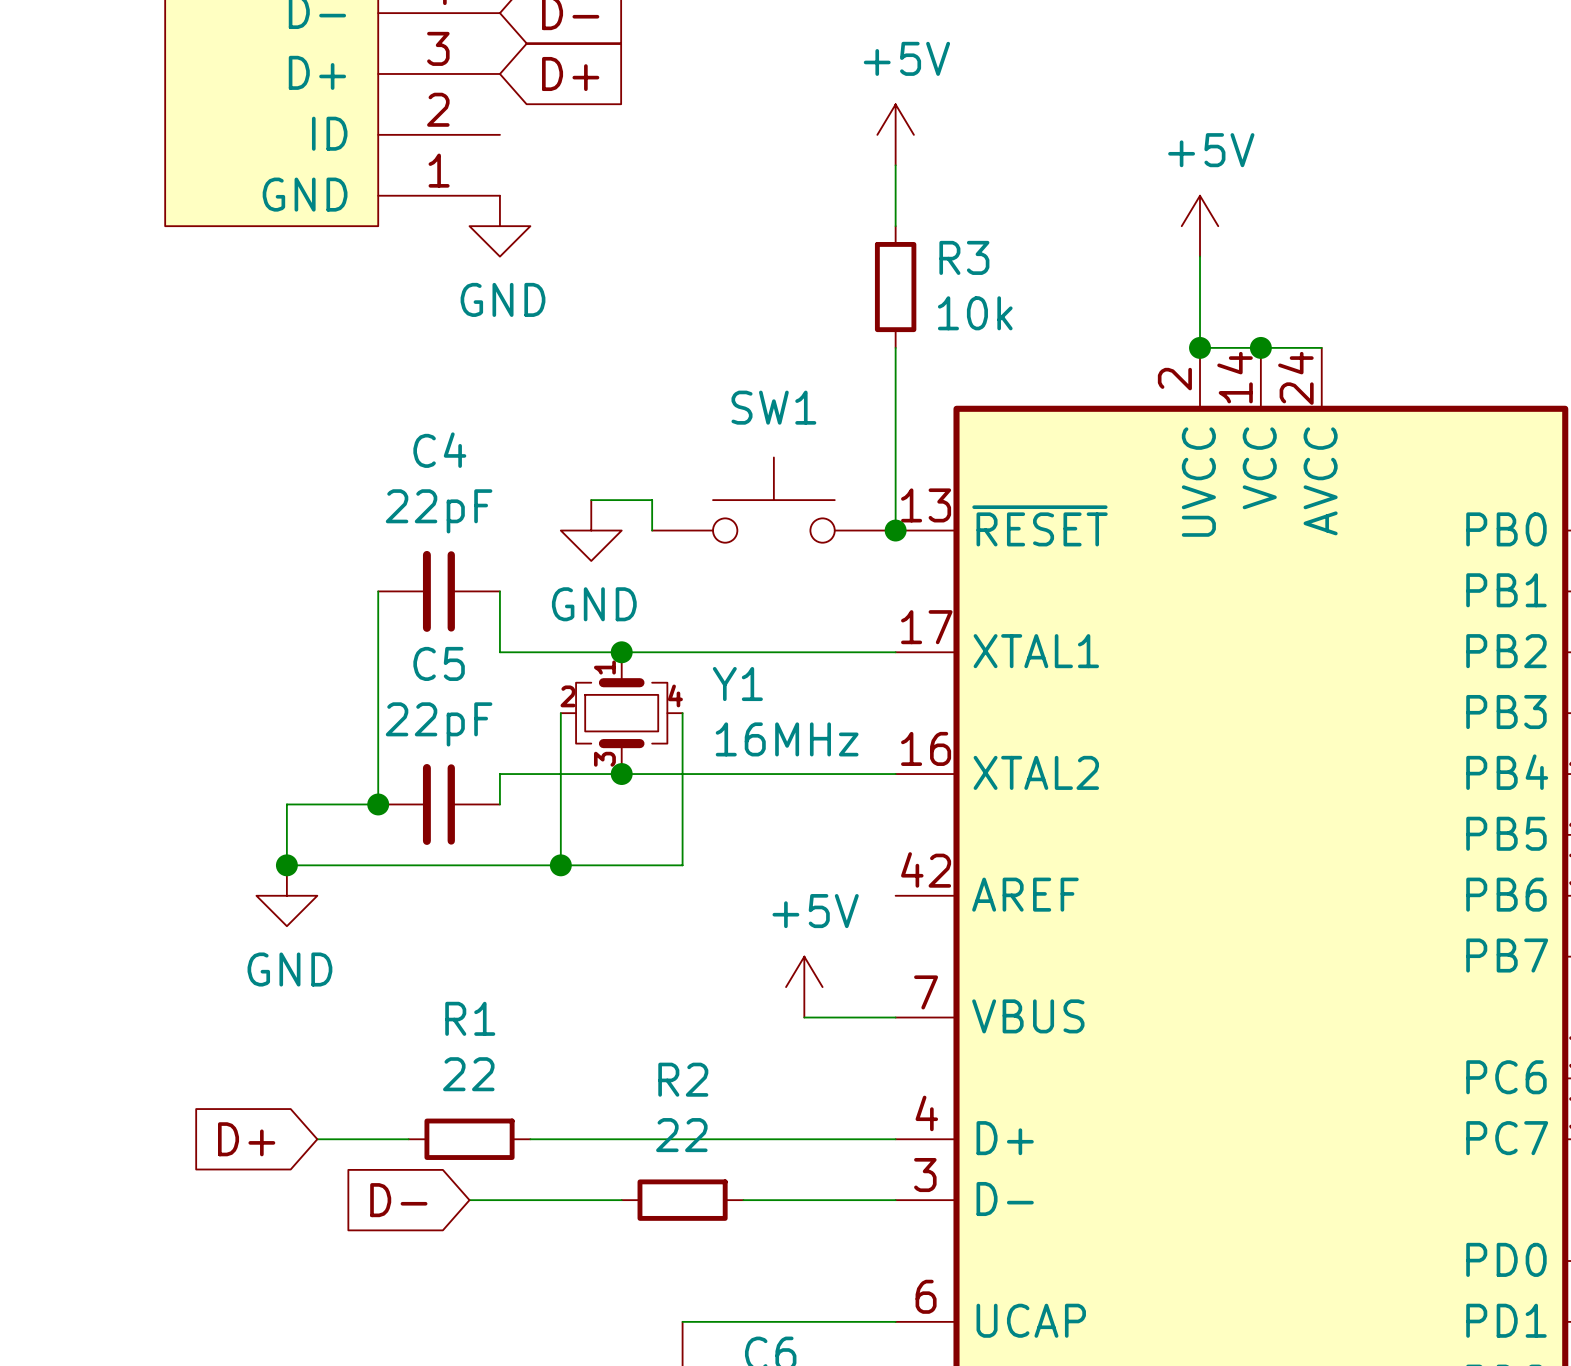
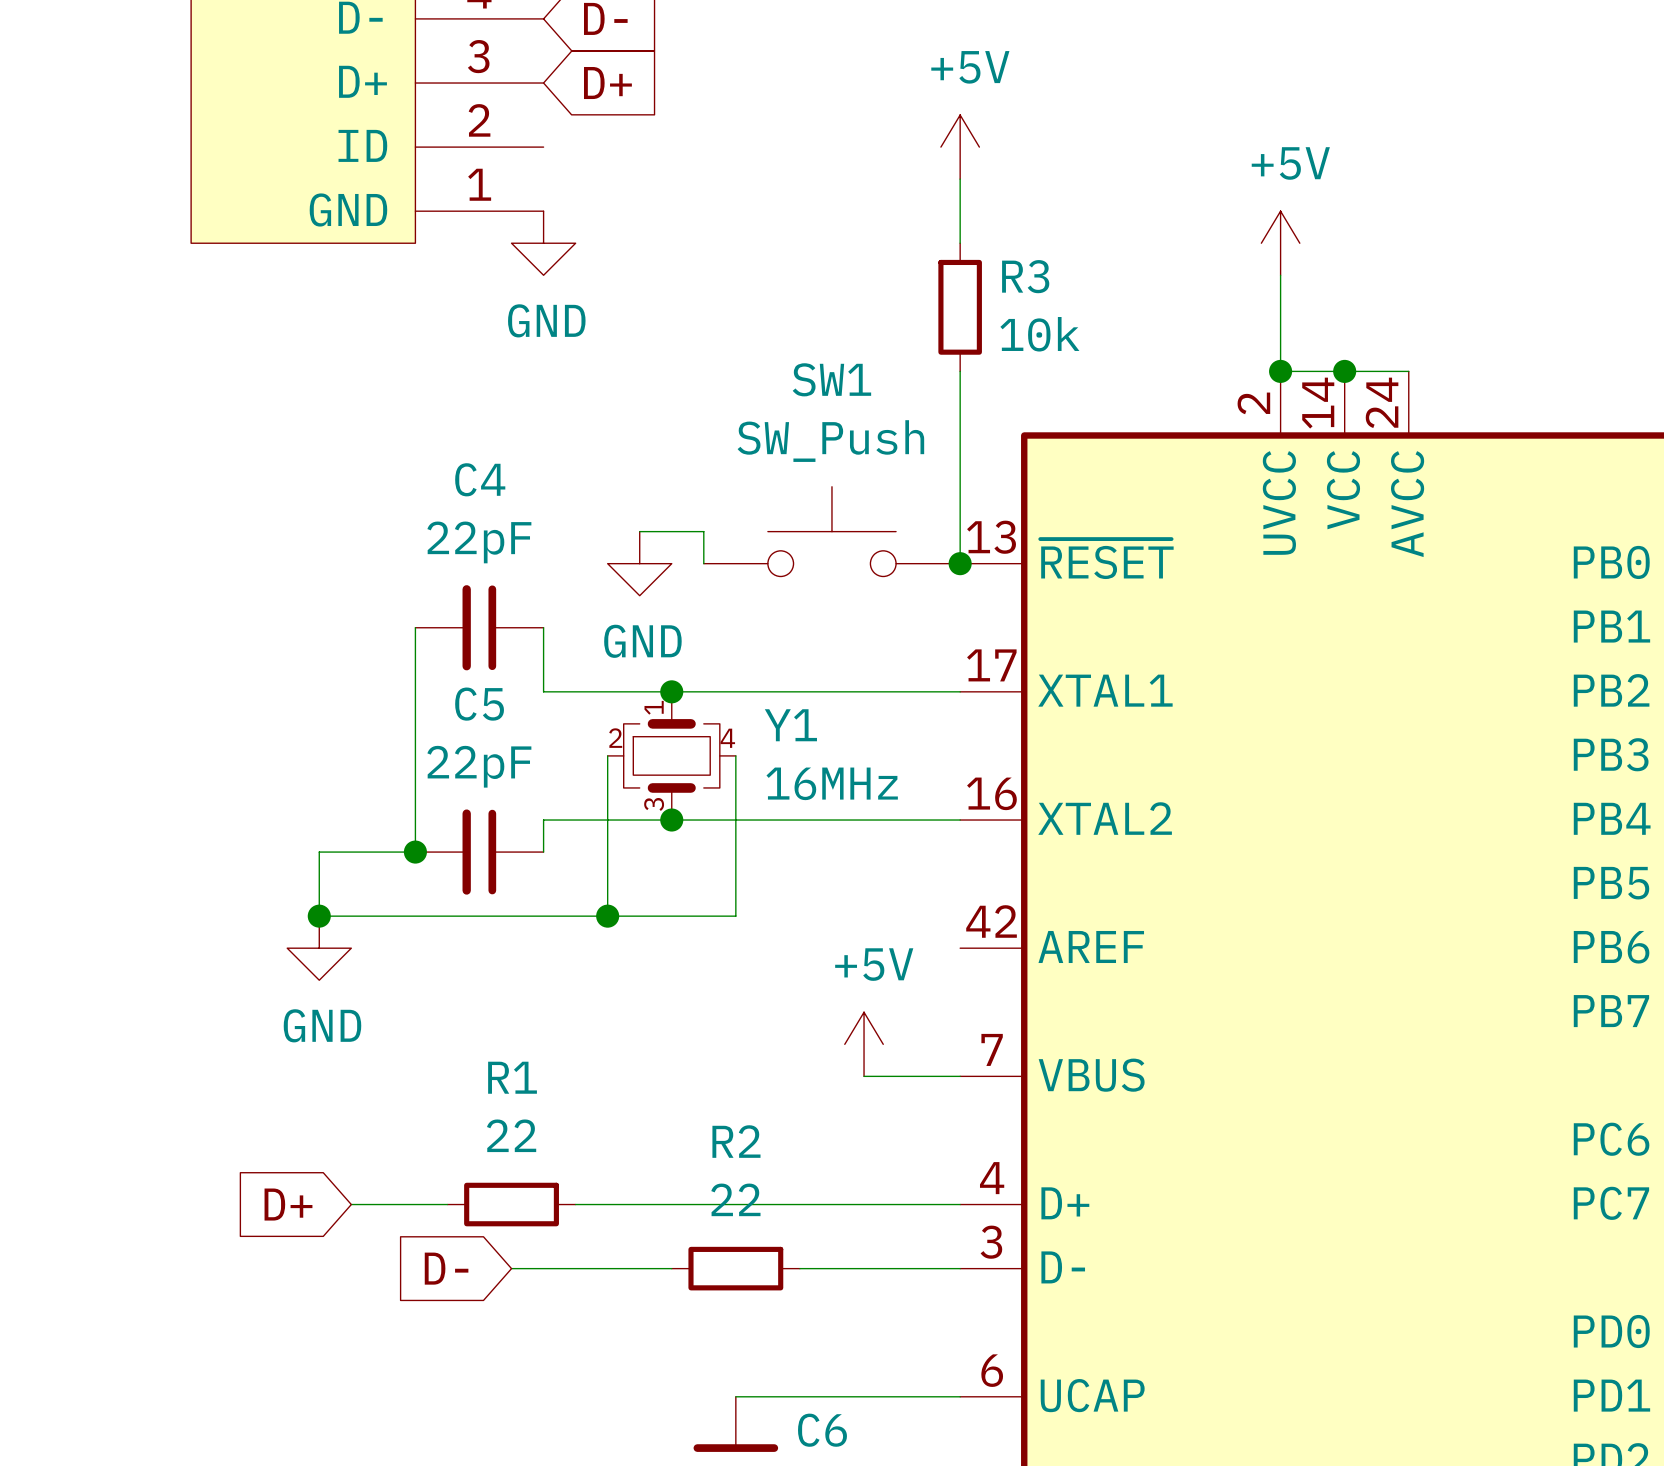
SW1 name position: SW1 (773, 407) -> SW1 (831, 379)
SW1 value: none -> SW_Push (830, 441)

